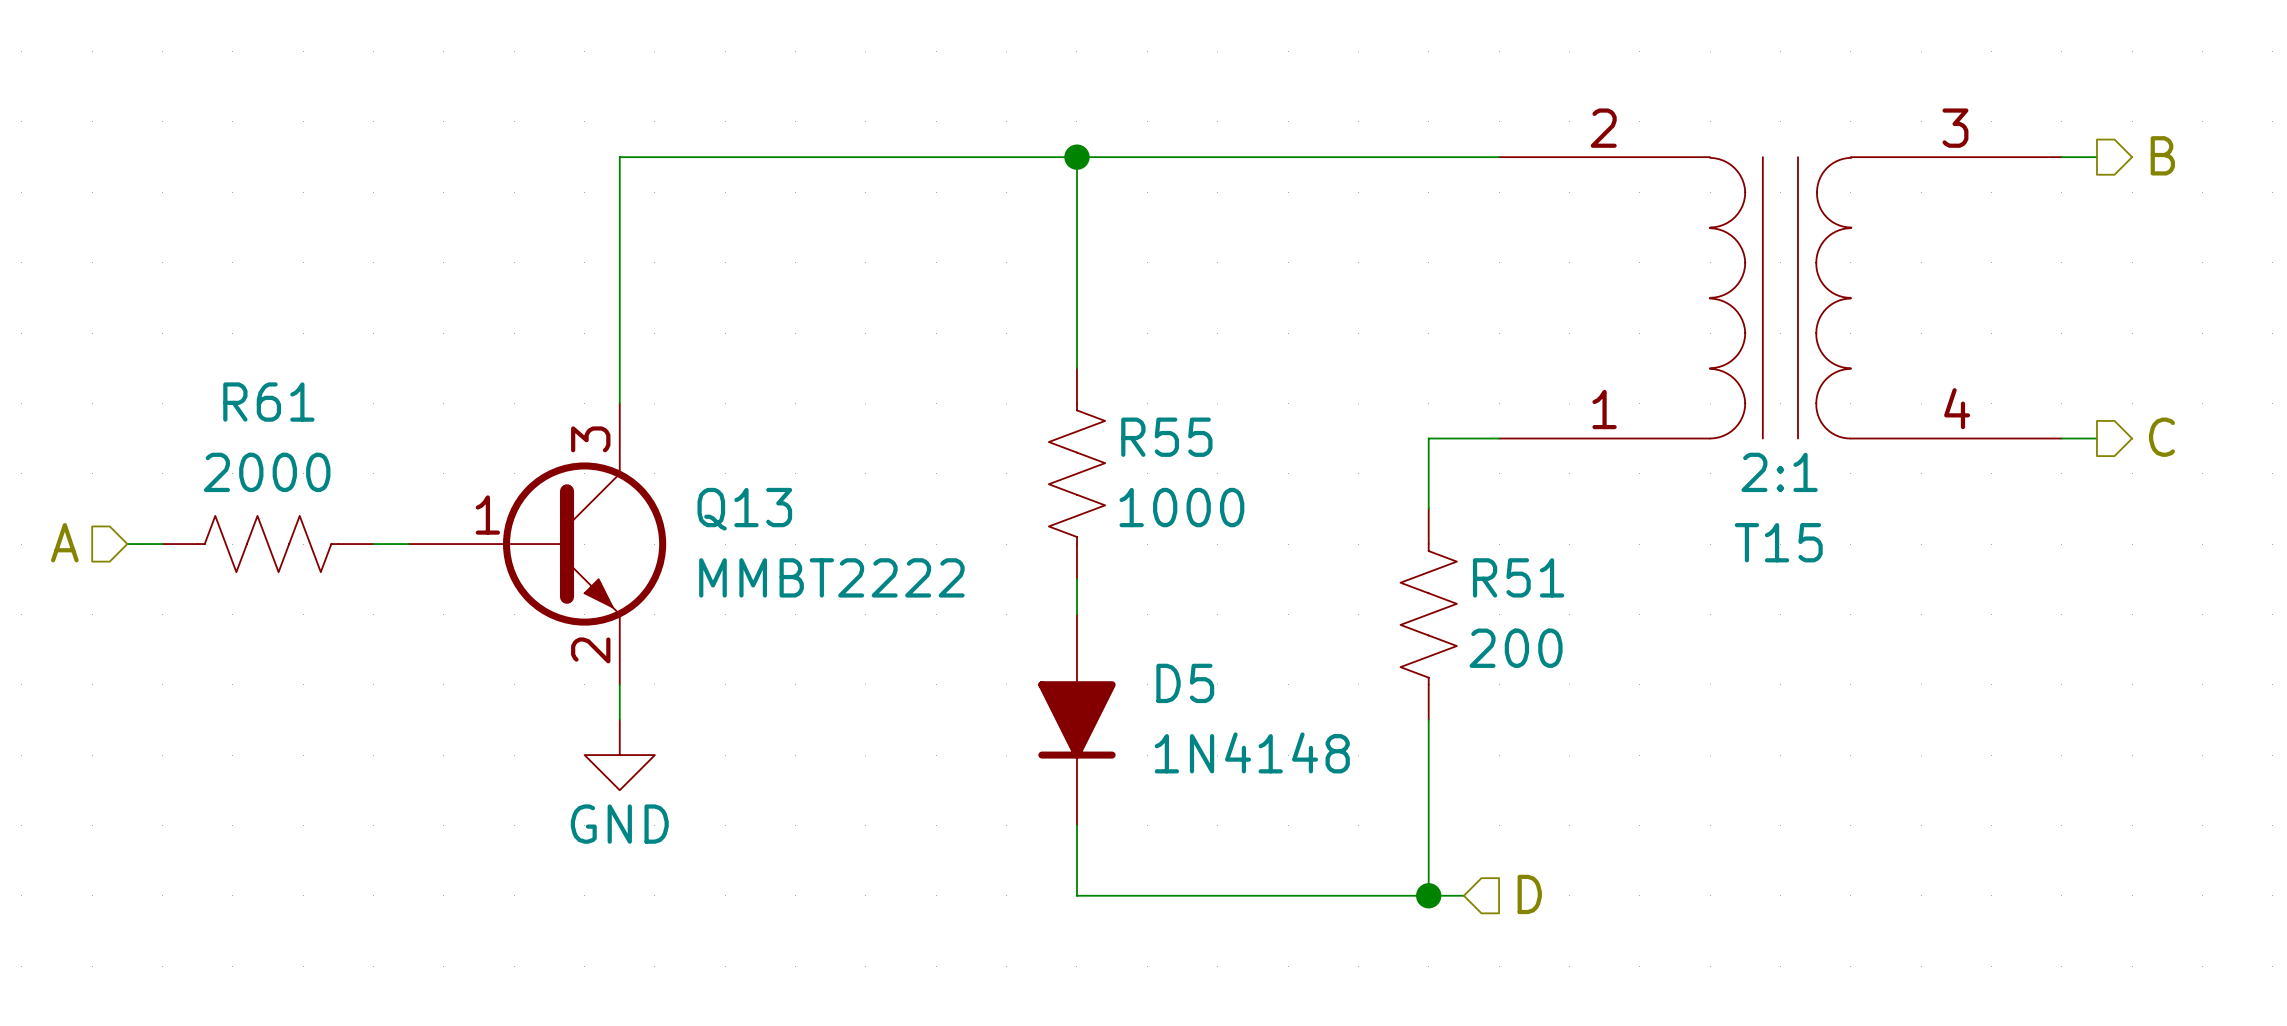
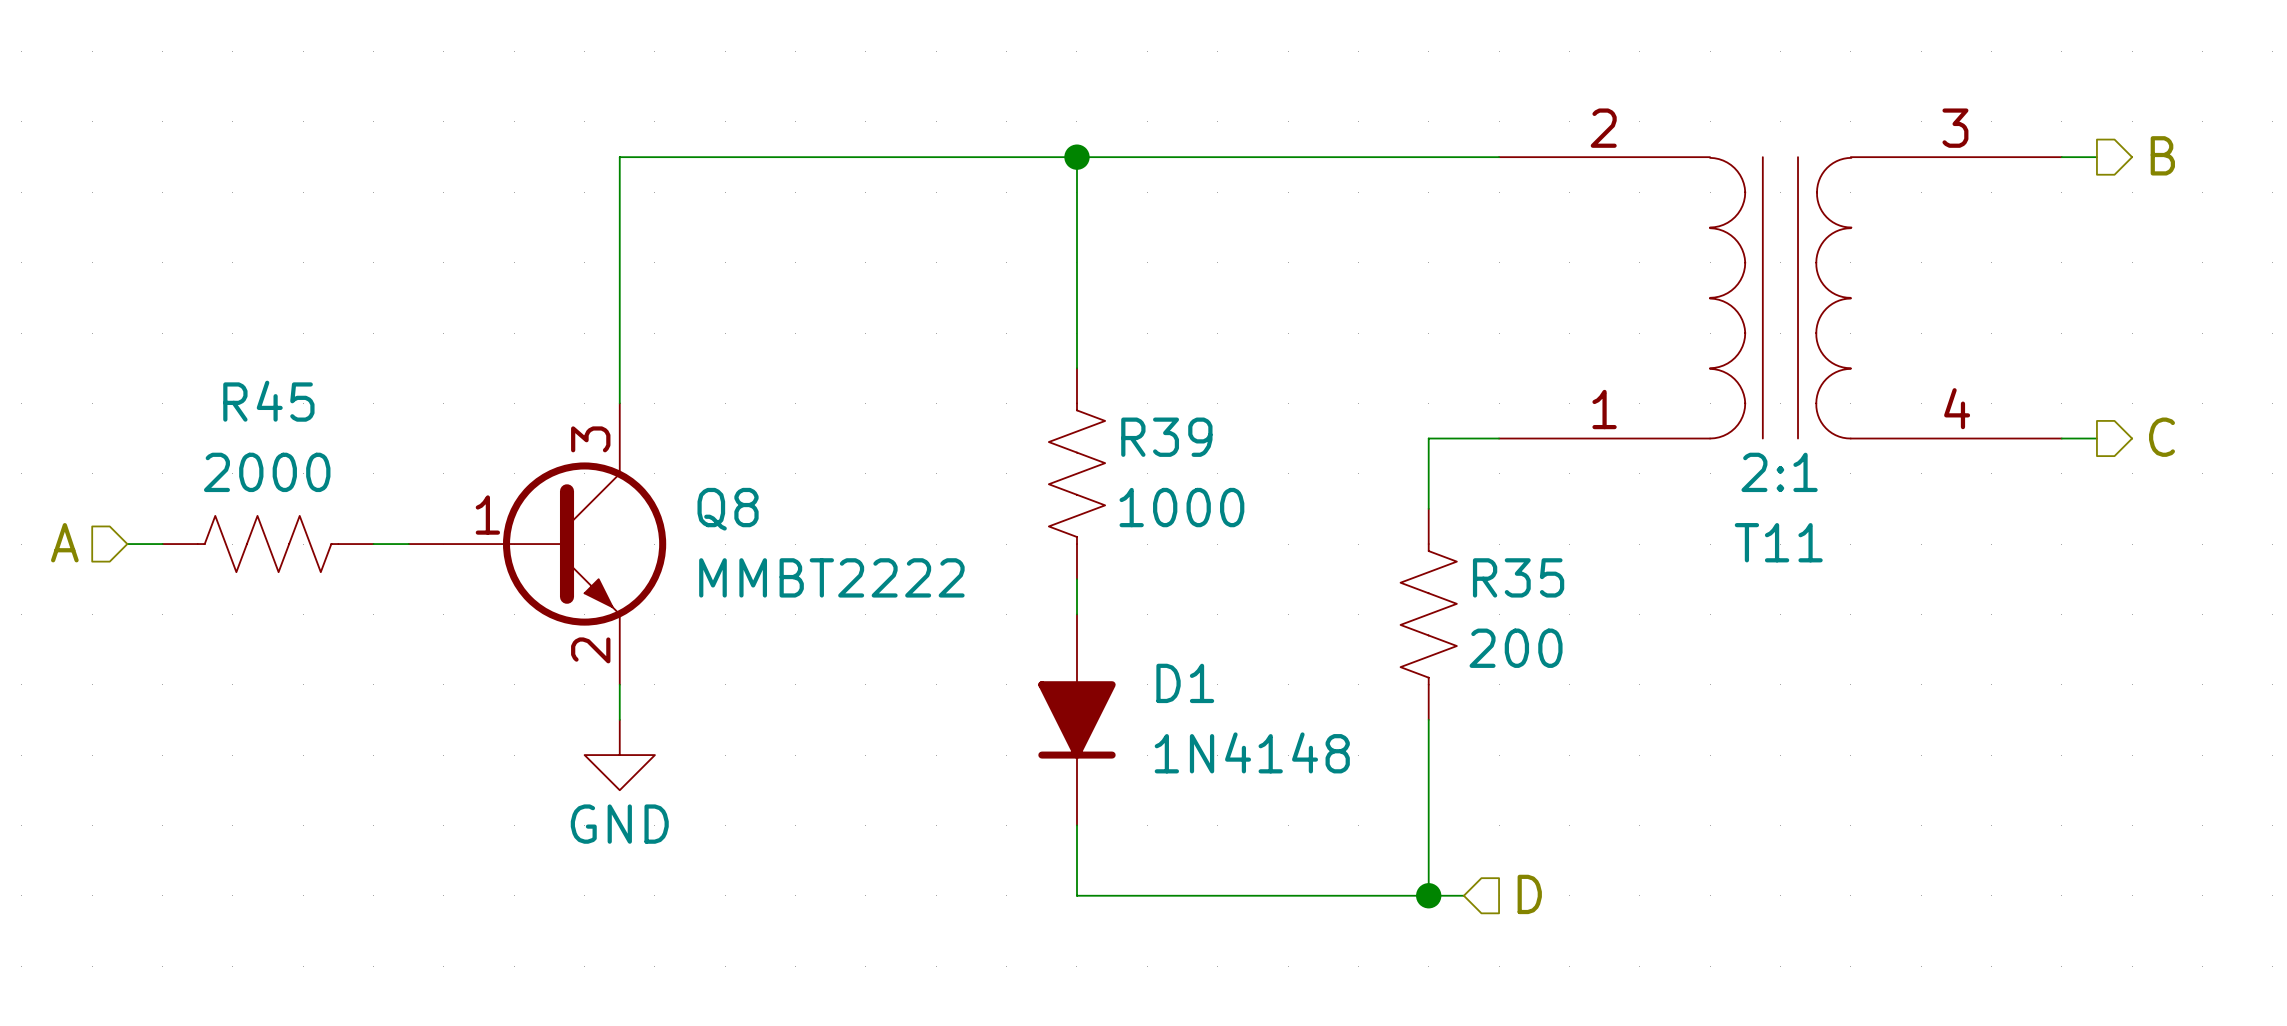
R61 name: R61 (268, 402) -> R45 (268, 401)
R55 name: R55 (1166, 437) -> R39 (1166, 437)
Q13 name: Q13 (744, 509) -> Q8 (728, 509)
T15 name: T15 (1778, 542) -> T11 (1778, 542)
R51 name: R51 (1518, 577) -> R35 (1518, 577)
D5 name: D5 (1185, 683) -> D1 (1185, 683)

